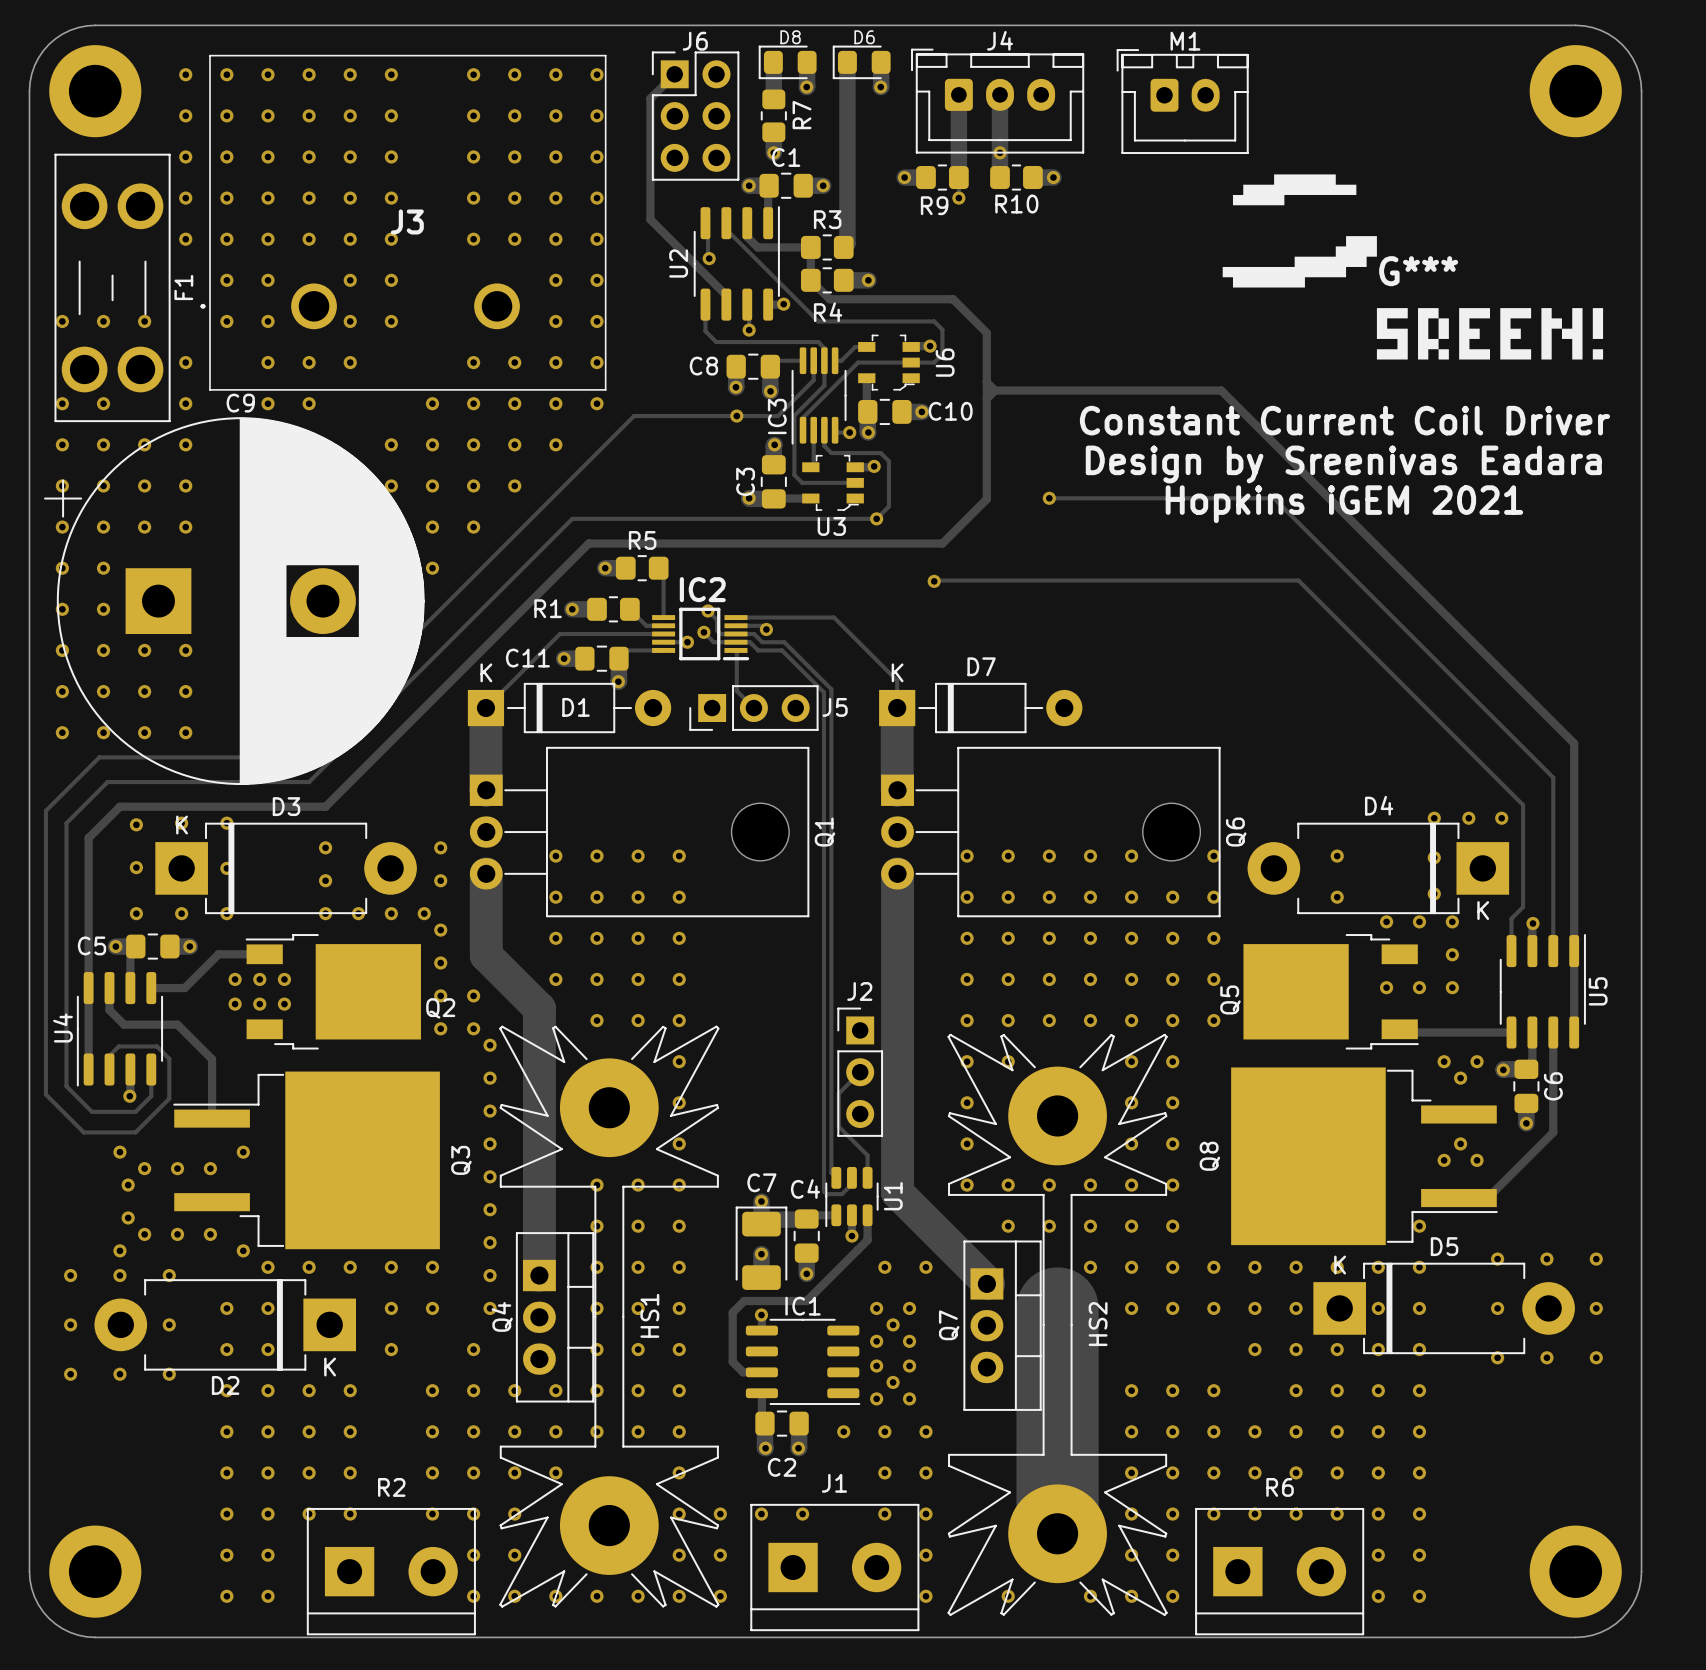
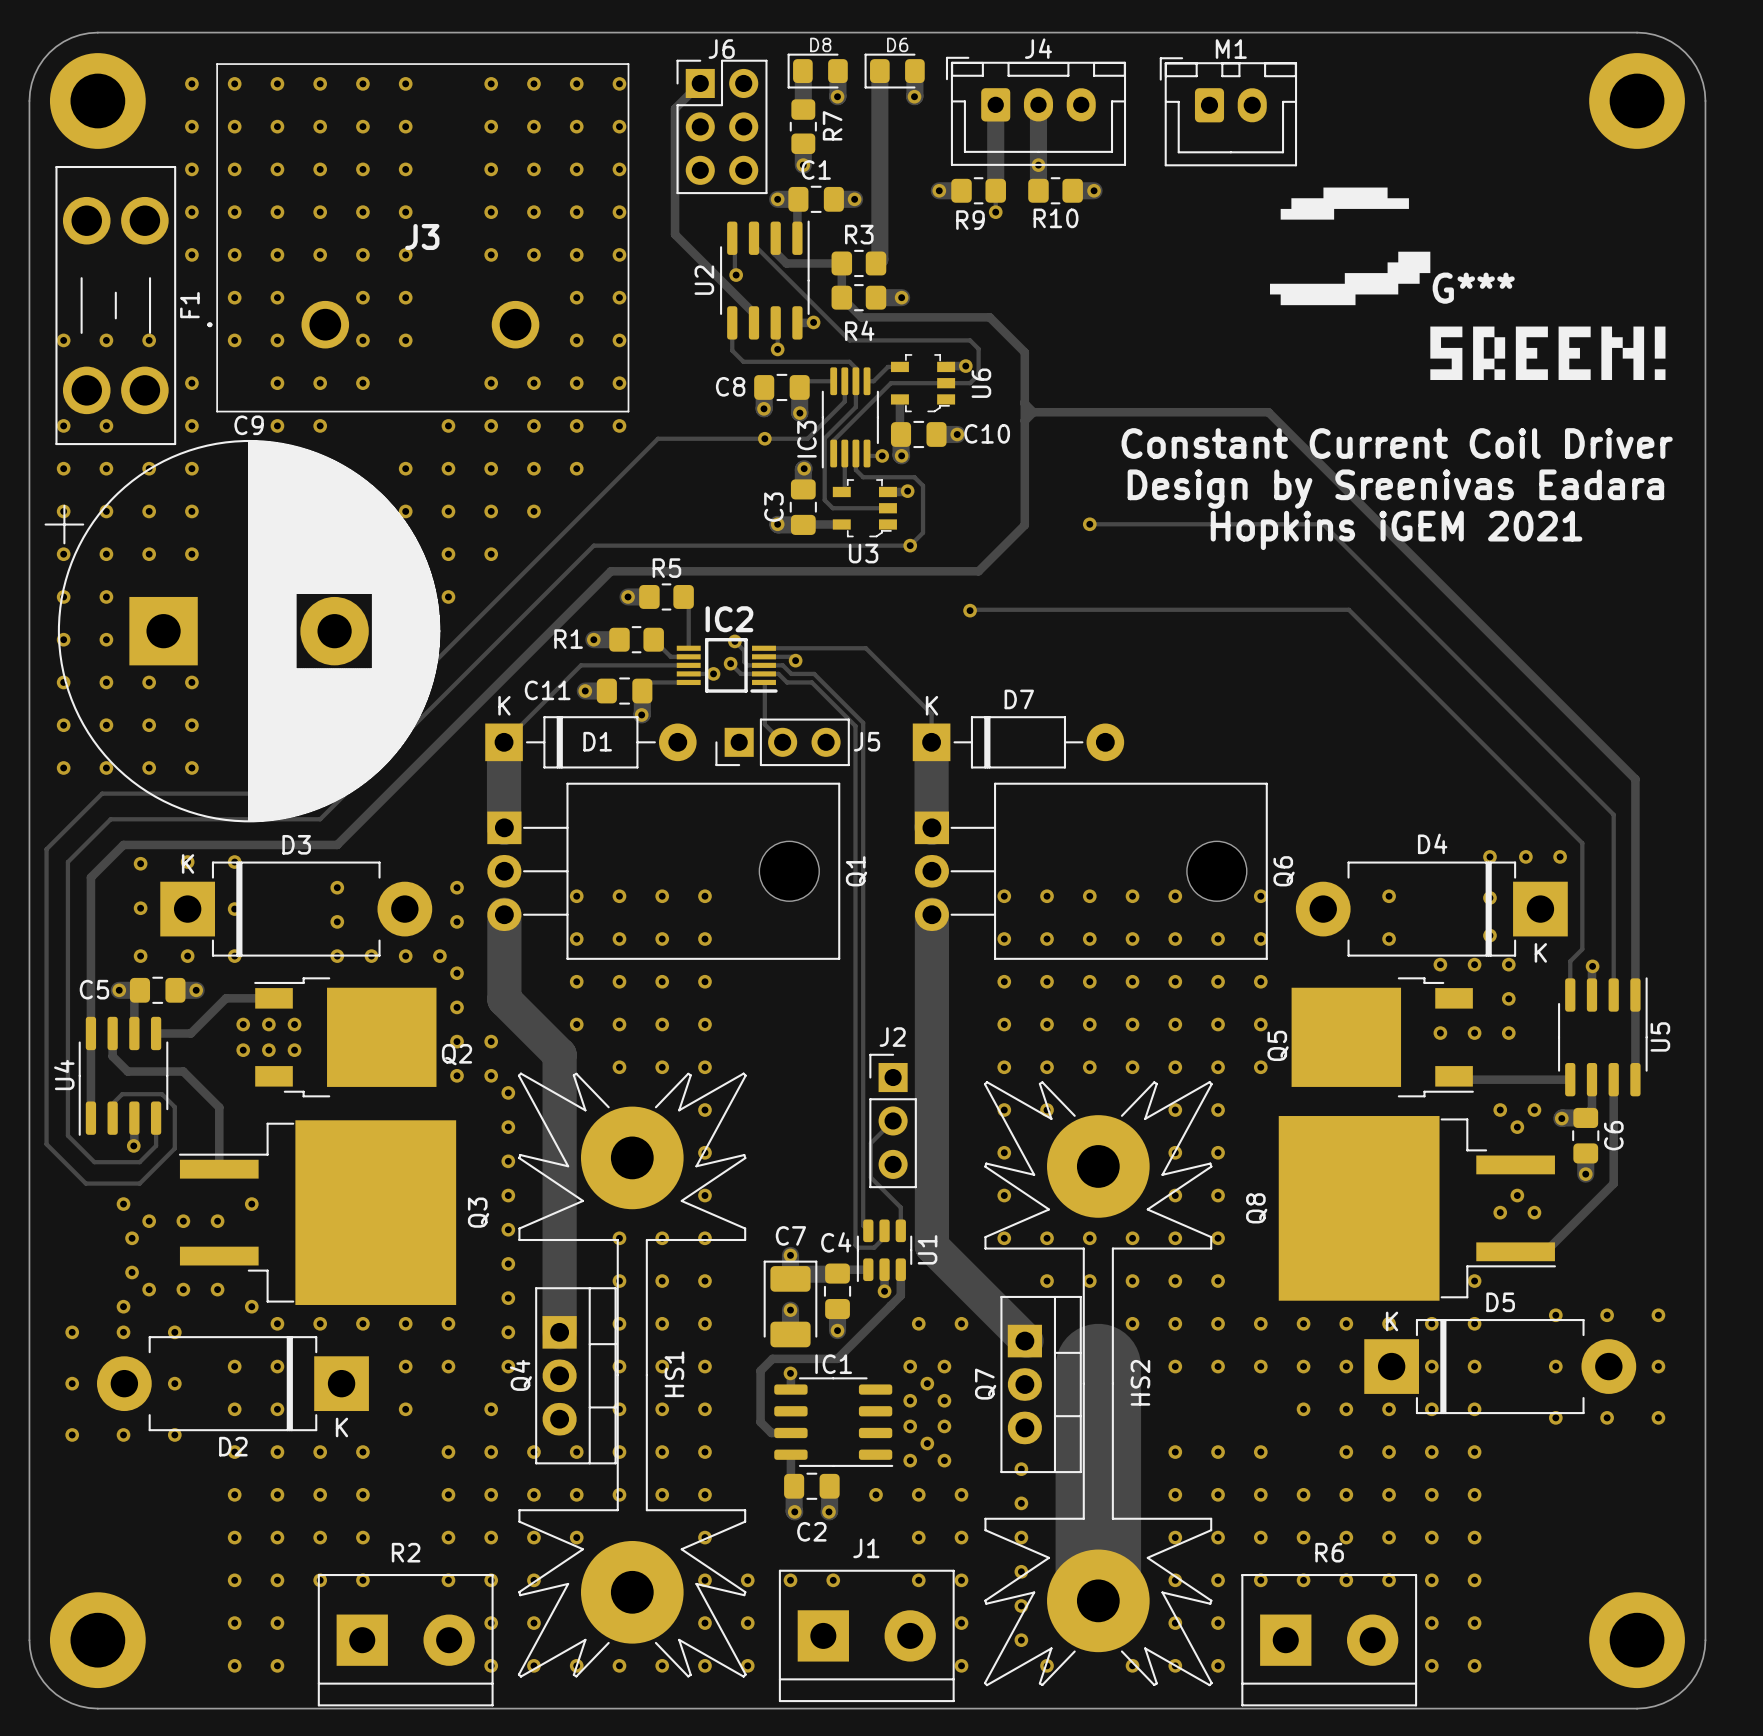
via: none -> (1021, 1469)
via: none -> (1021, 1503)
via: none -> (1021, 1537)
via: none -> (1021, 1571)
via: none -> (1021, 1605)
via: none -> (1021, 1640)

